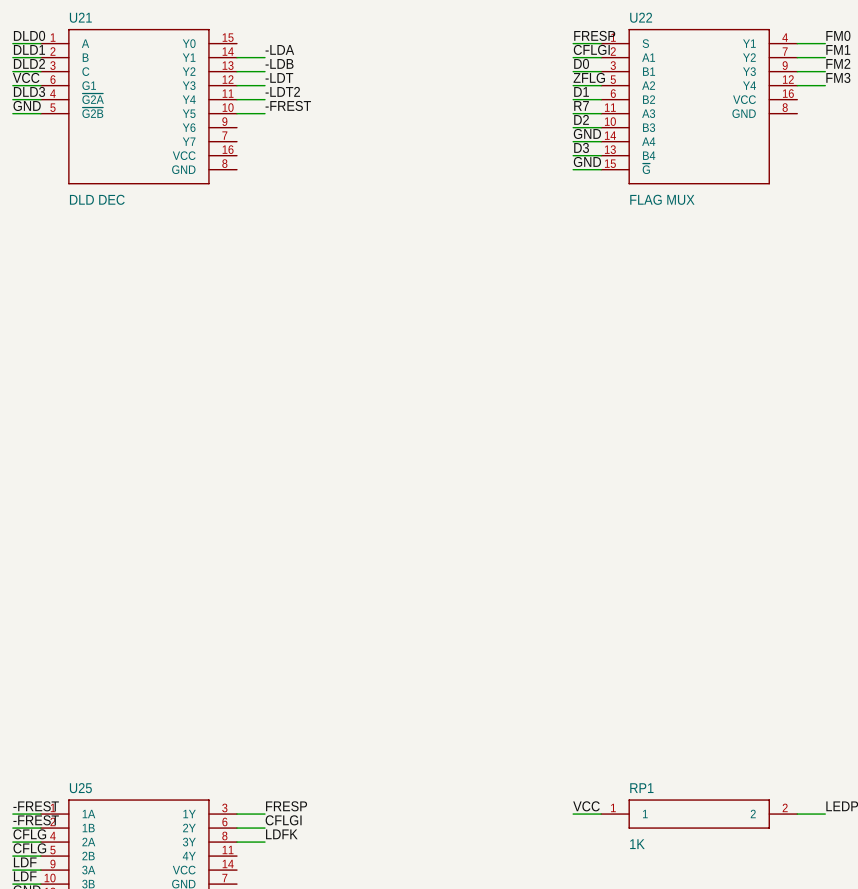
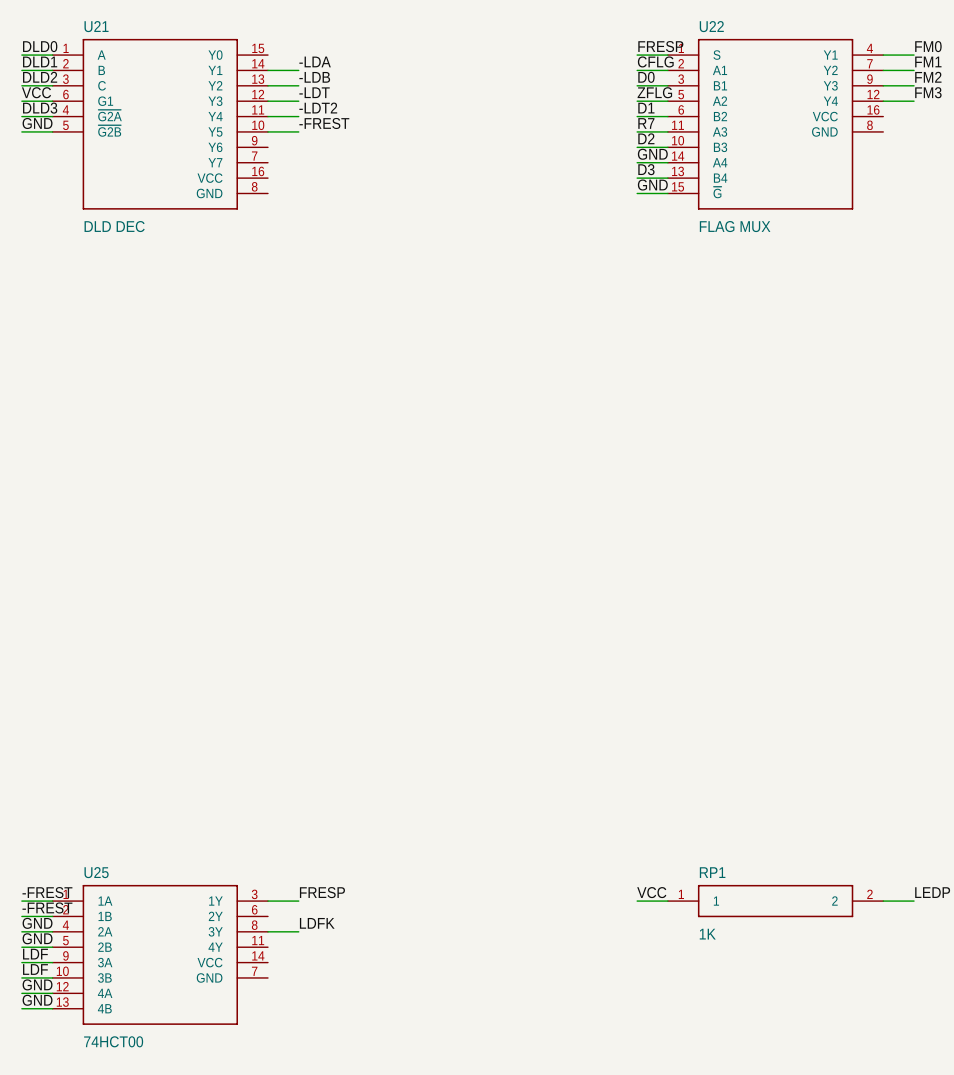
label: CFLGI (591, 49) -> CFLG (655, 61)
label: CFLGI (283, 820) -> none
wire: (236, 828) (264, 828) -> none
label: CFLG (29, 834) -> GND (37, 923)
label: CFLG (29, 848) -> GND (37, 938)

